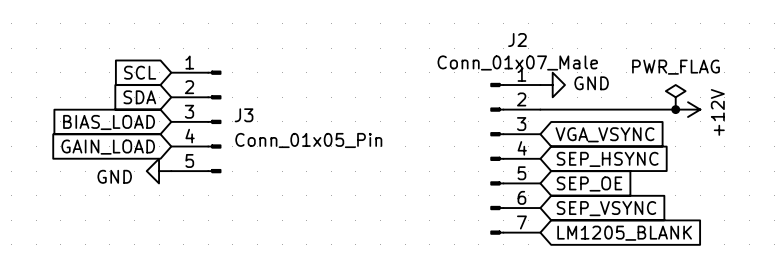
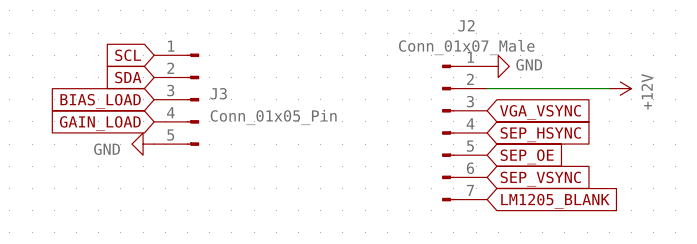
power symbol: PWR_FLAG (675, 97) -> none
junction: (675, 109) -> none

